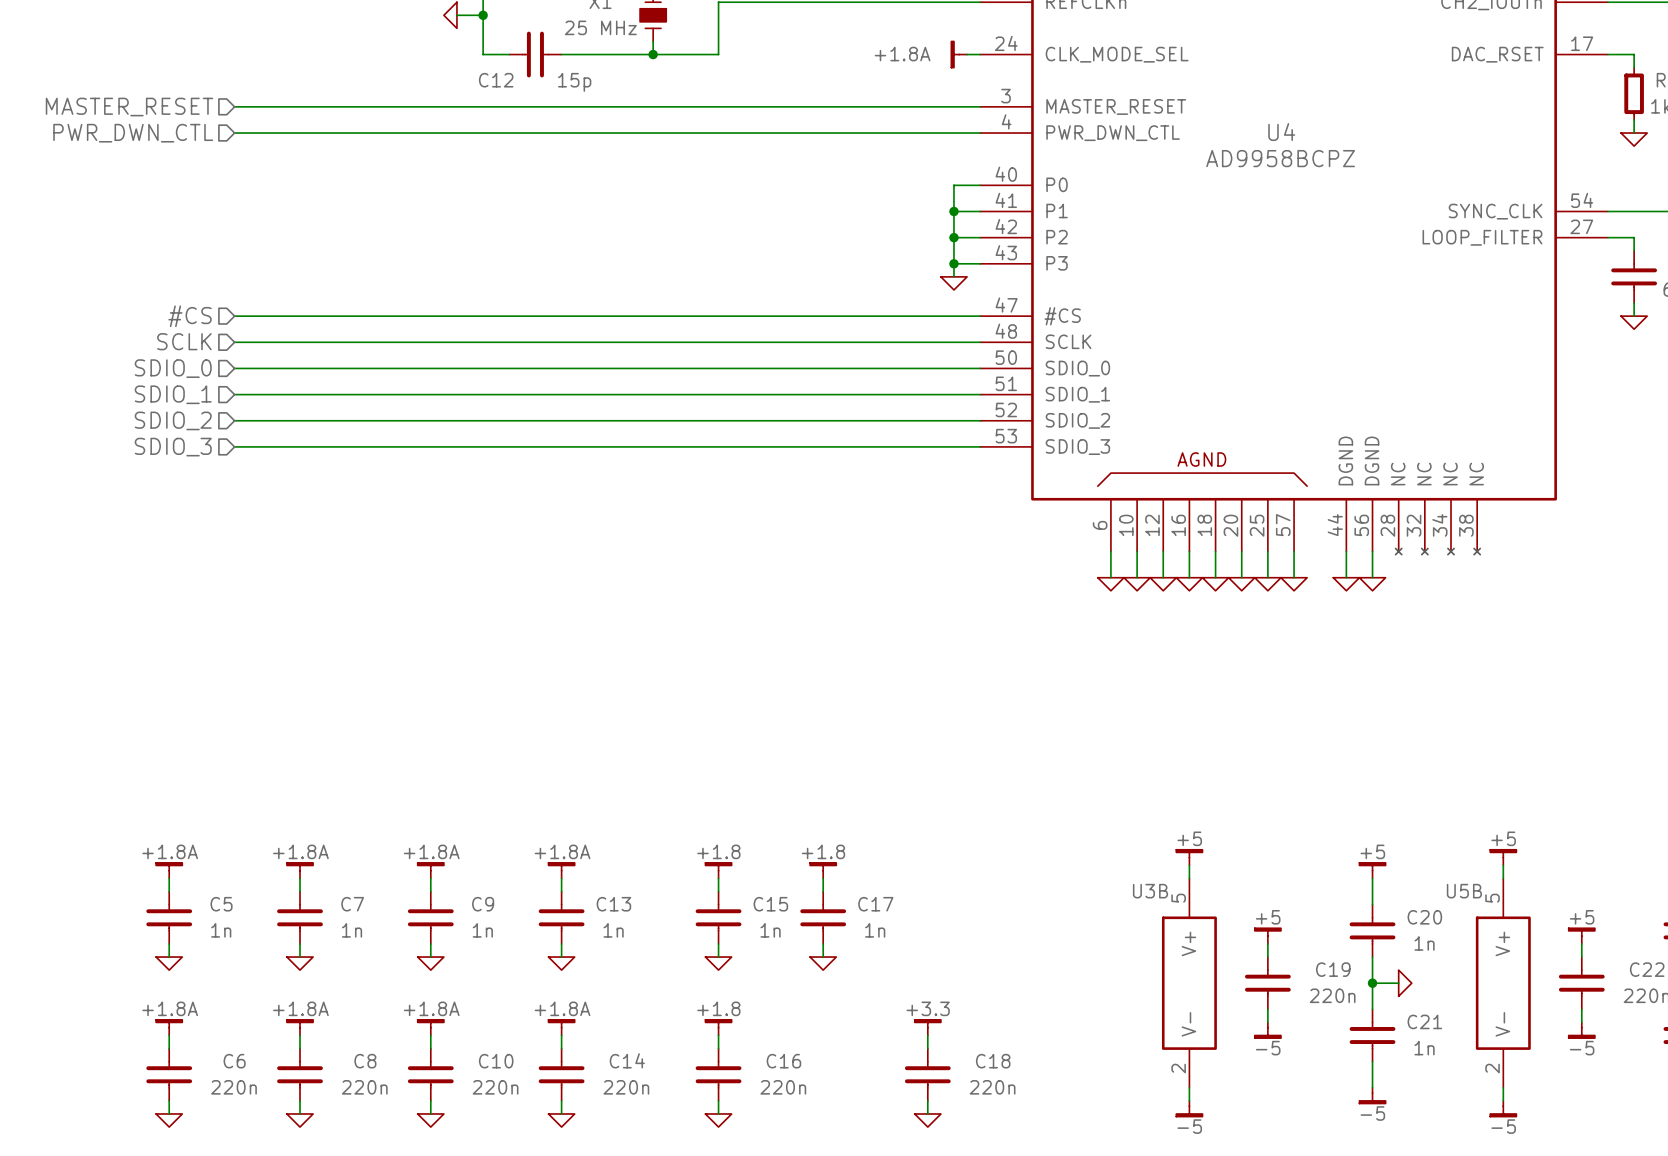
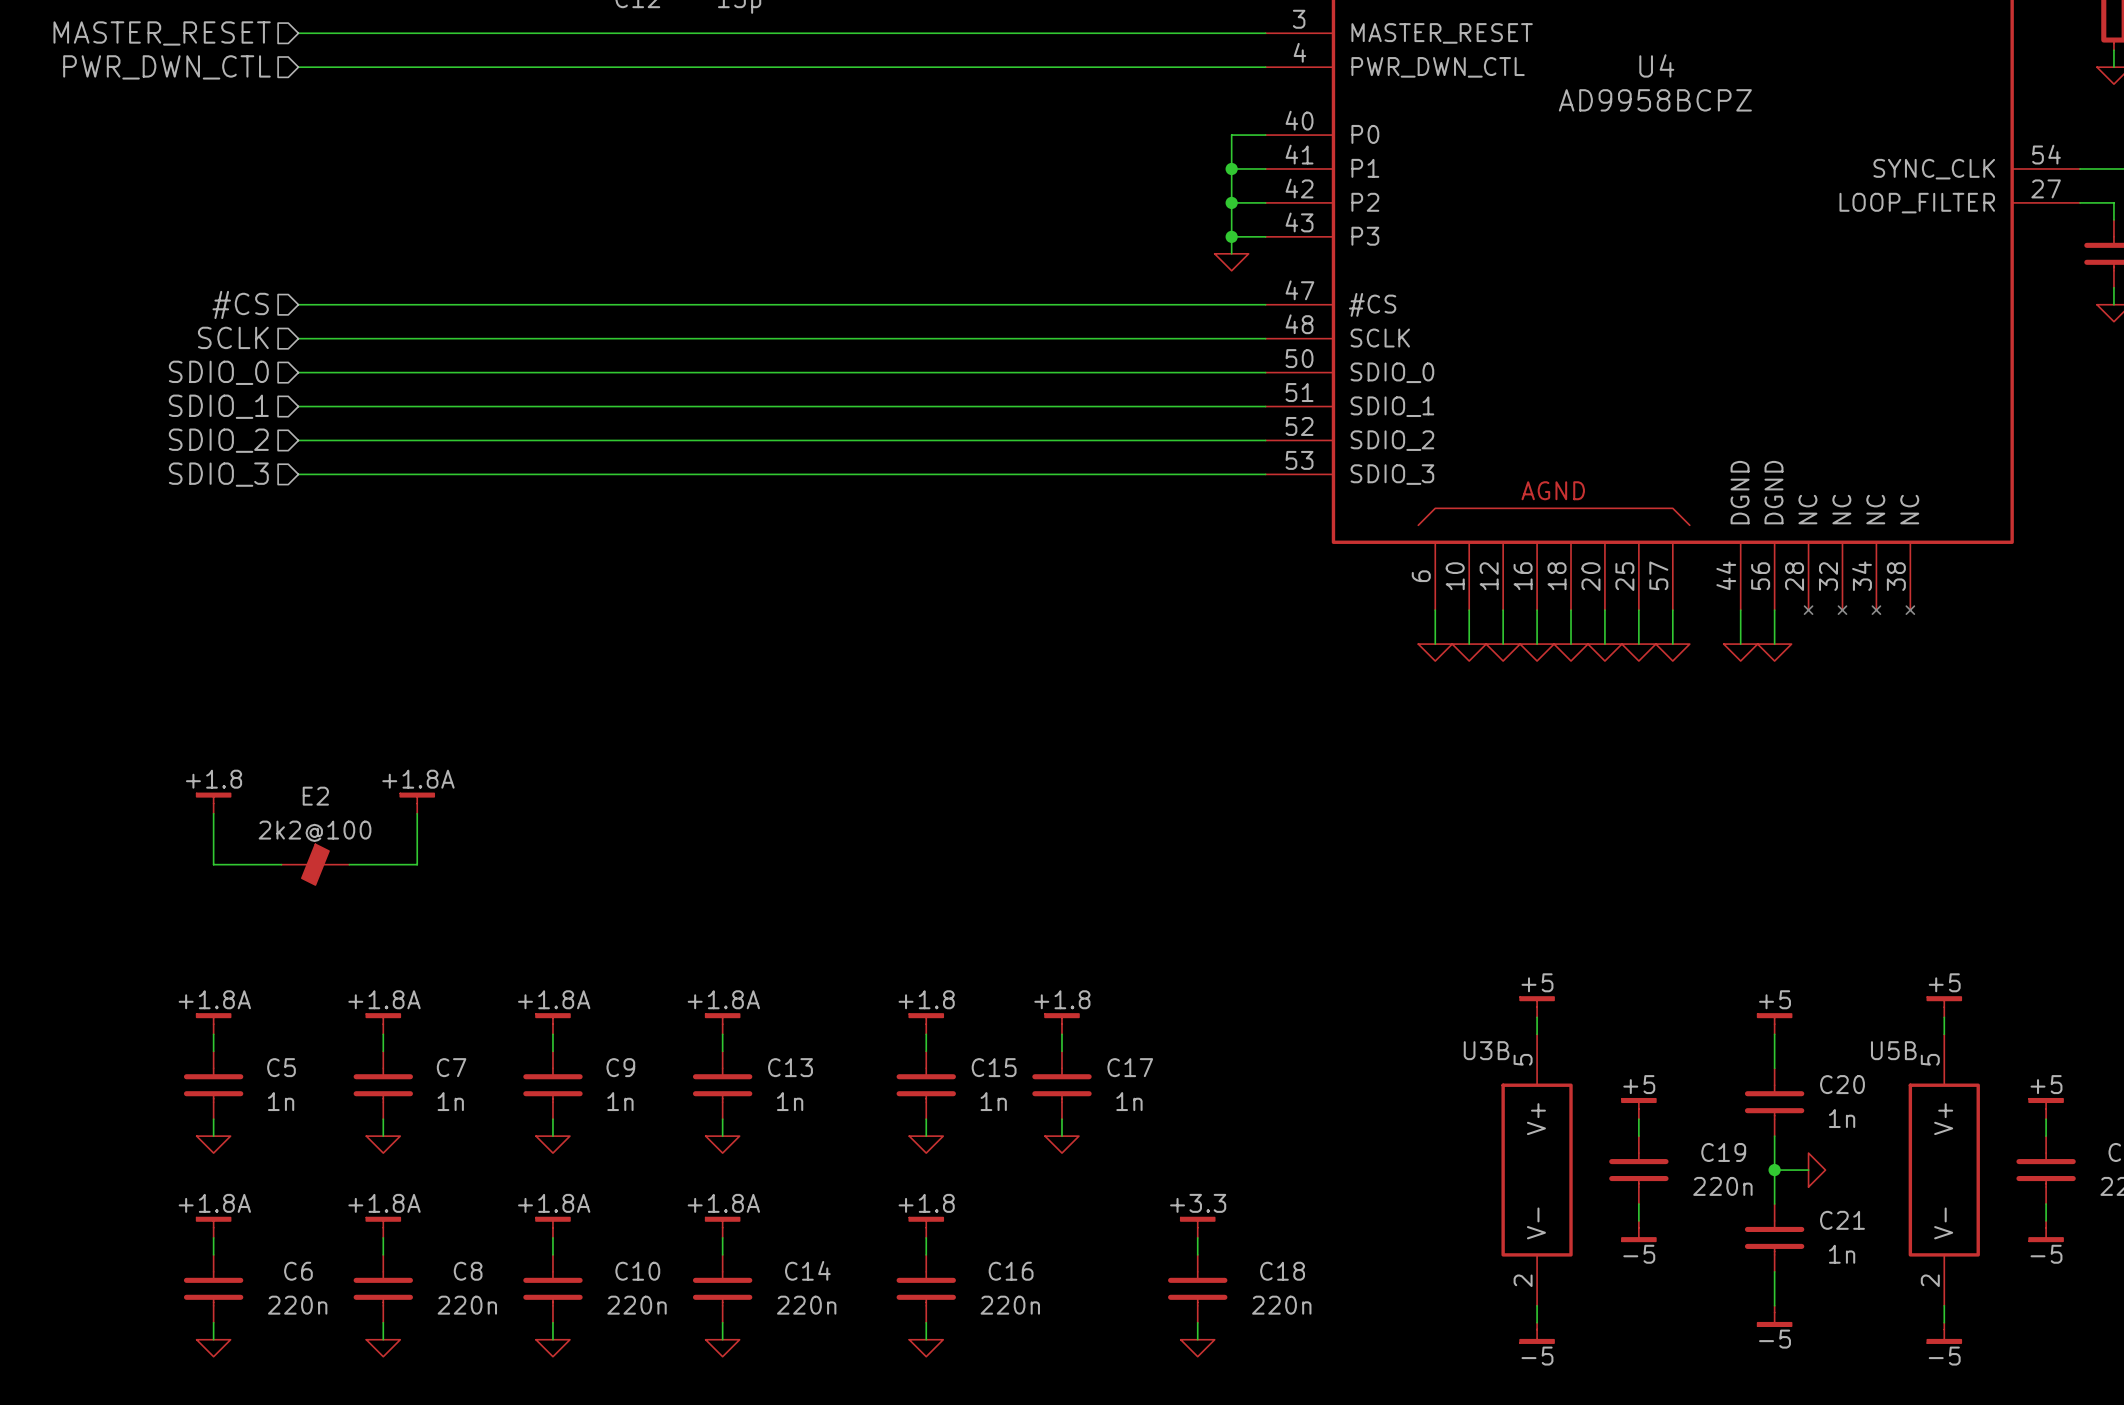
power symbol: none -> +1.8 (213, 803)
power symbol: none -> +1.8A (417, 803)
wire: none -> (213, 813) (213, 864) (281, 864)
wire: none -> (417, 813) (417, 864) (349, 864)
E2: none -> 2k2@100 (315, 864)

